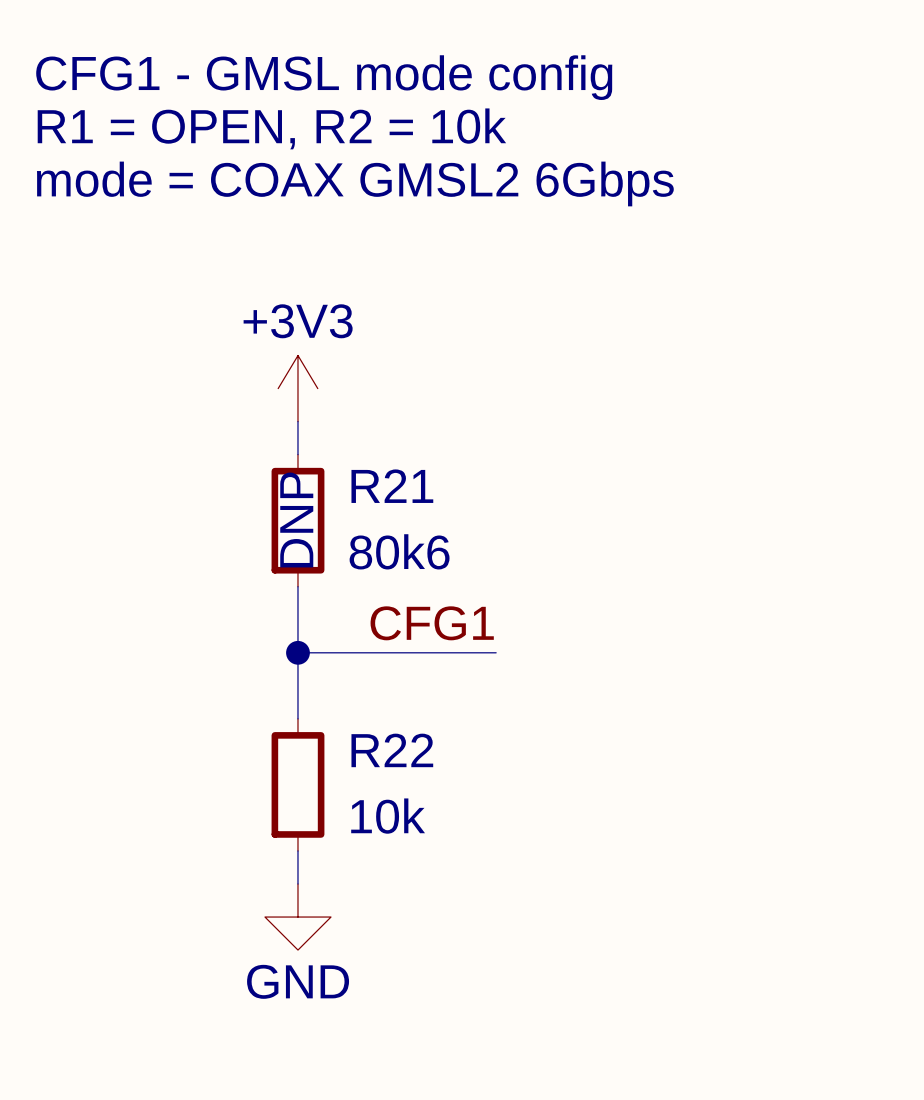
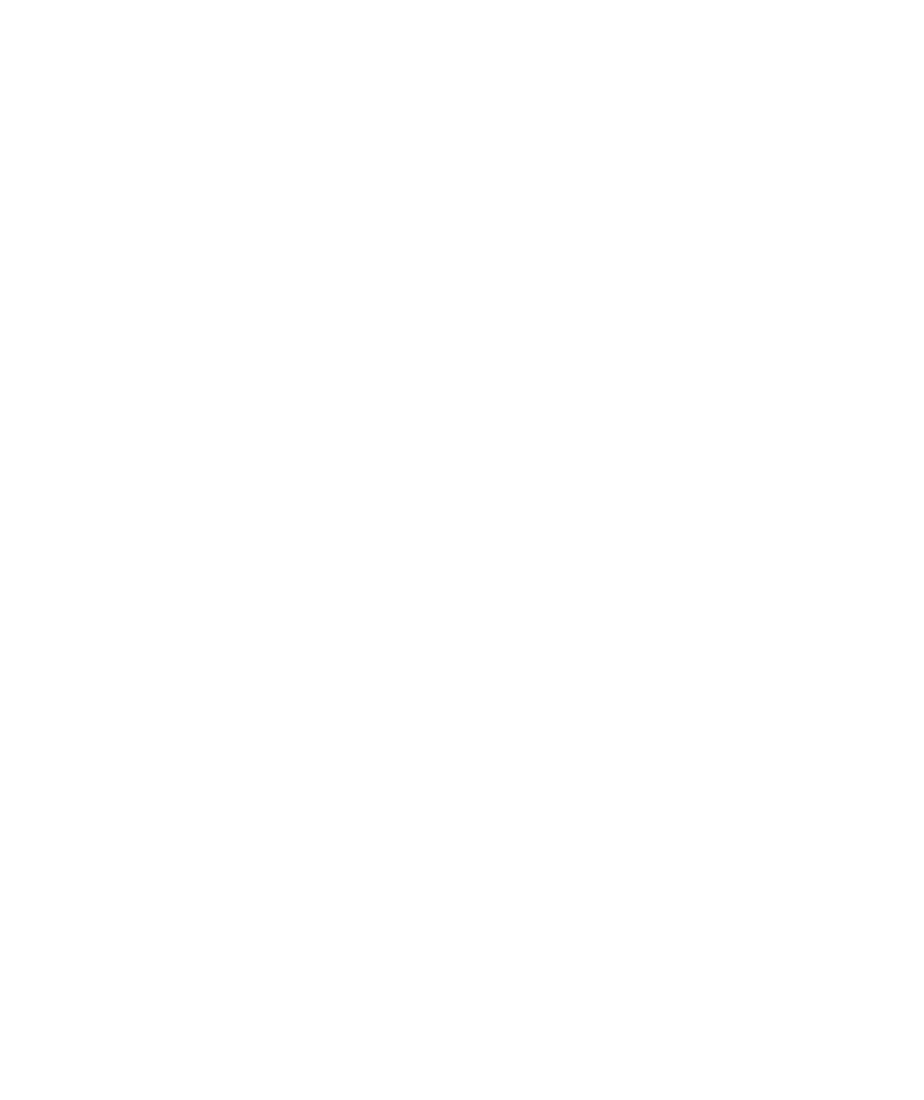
text: CFG1 - GMSL mode config (324, 77) -> none
text: R1 = OPEN, R2 = 10k (271, 128) -> none
text: mode = COAX GMSL2 6Gbps (355, 183) -> none
power symbol: +3V3 (297, 388) -> none
wire: (297, 421) (297, 454) -> none
R21: (297, 520) -> none
wire: (297, 586) (297, 718) -> none
label: CFG1 (432, 623) -> none
wire: (297, 652) (496, 652) -> none
junction: (297, 652) -> none
R22: (297, 784) -> none
wire: (297, 850) (297, 884) -> none
power symbol: GND (297, 917) -> none

